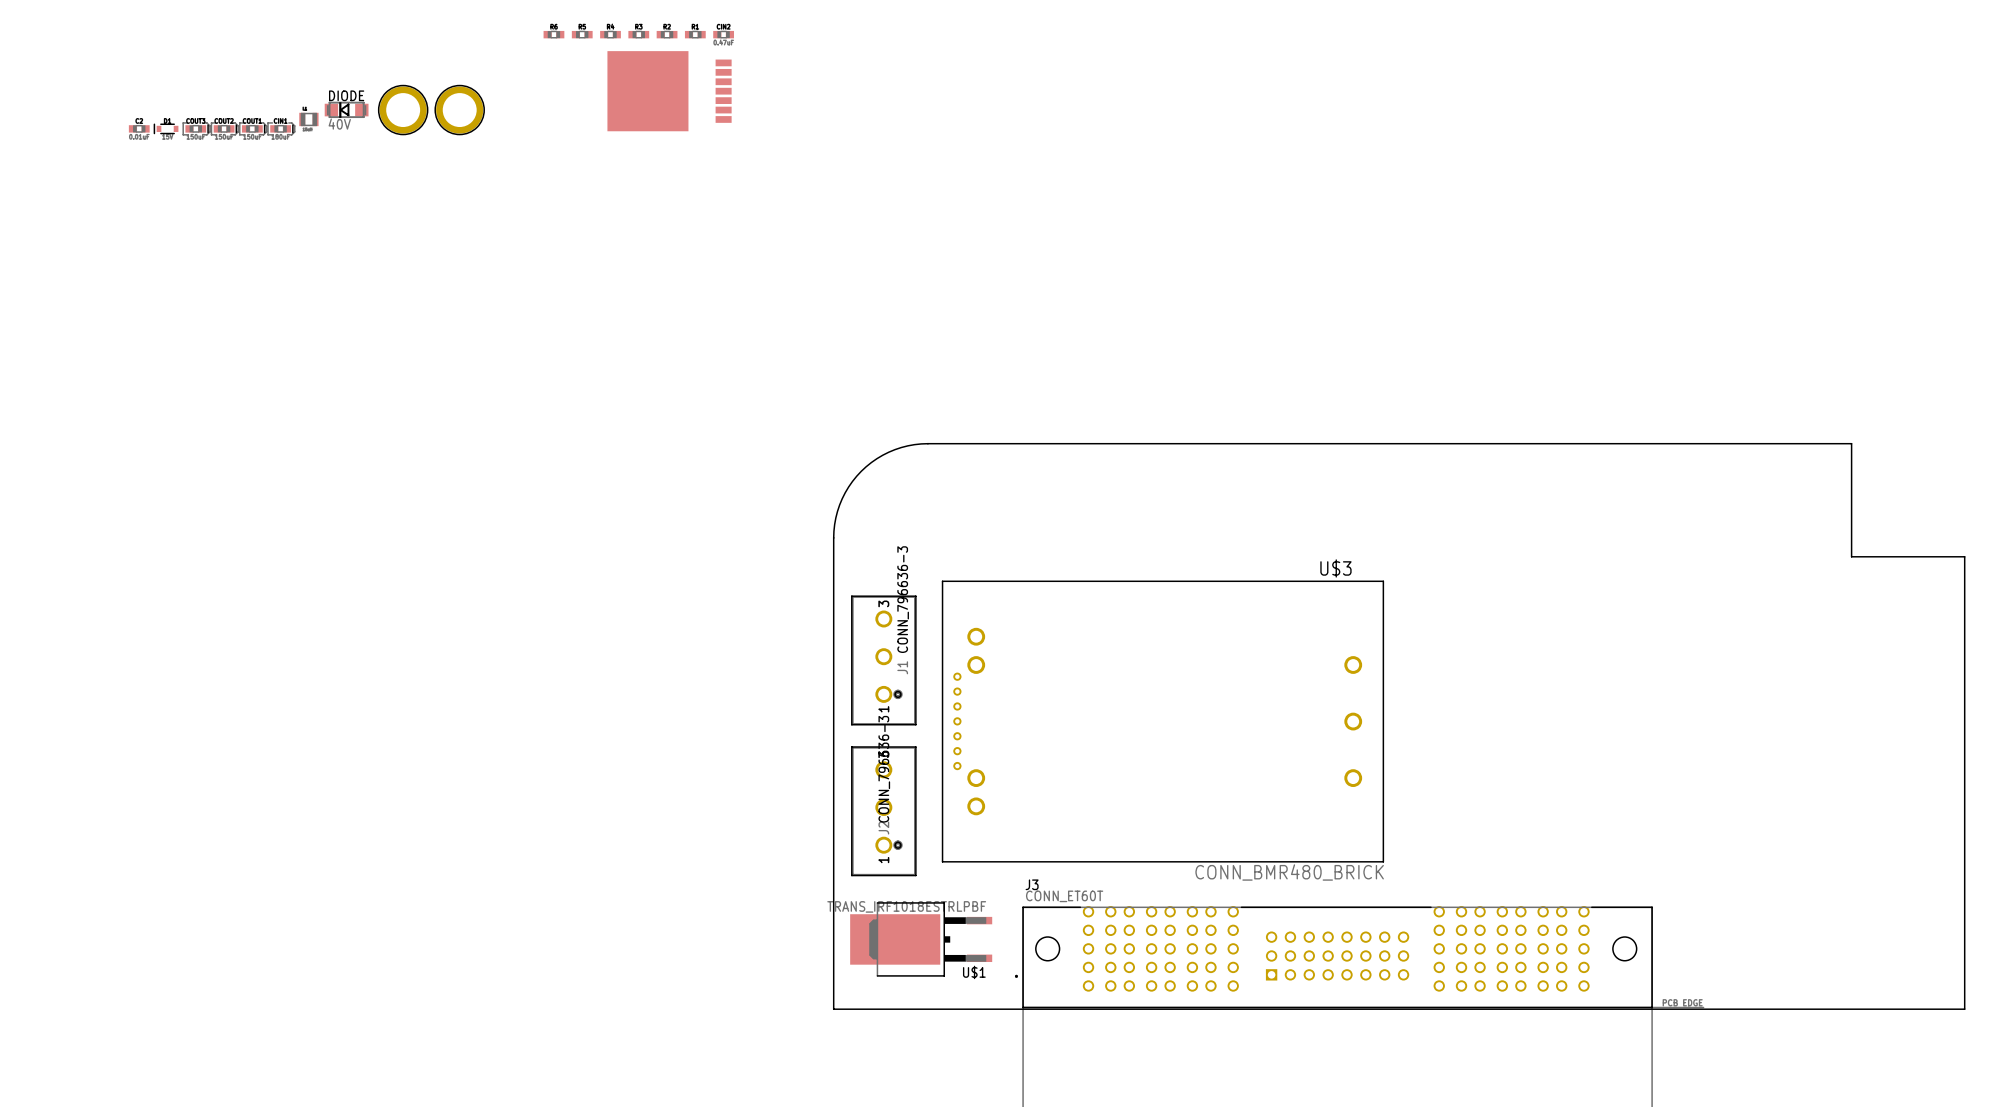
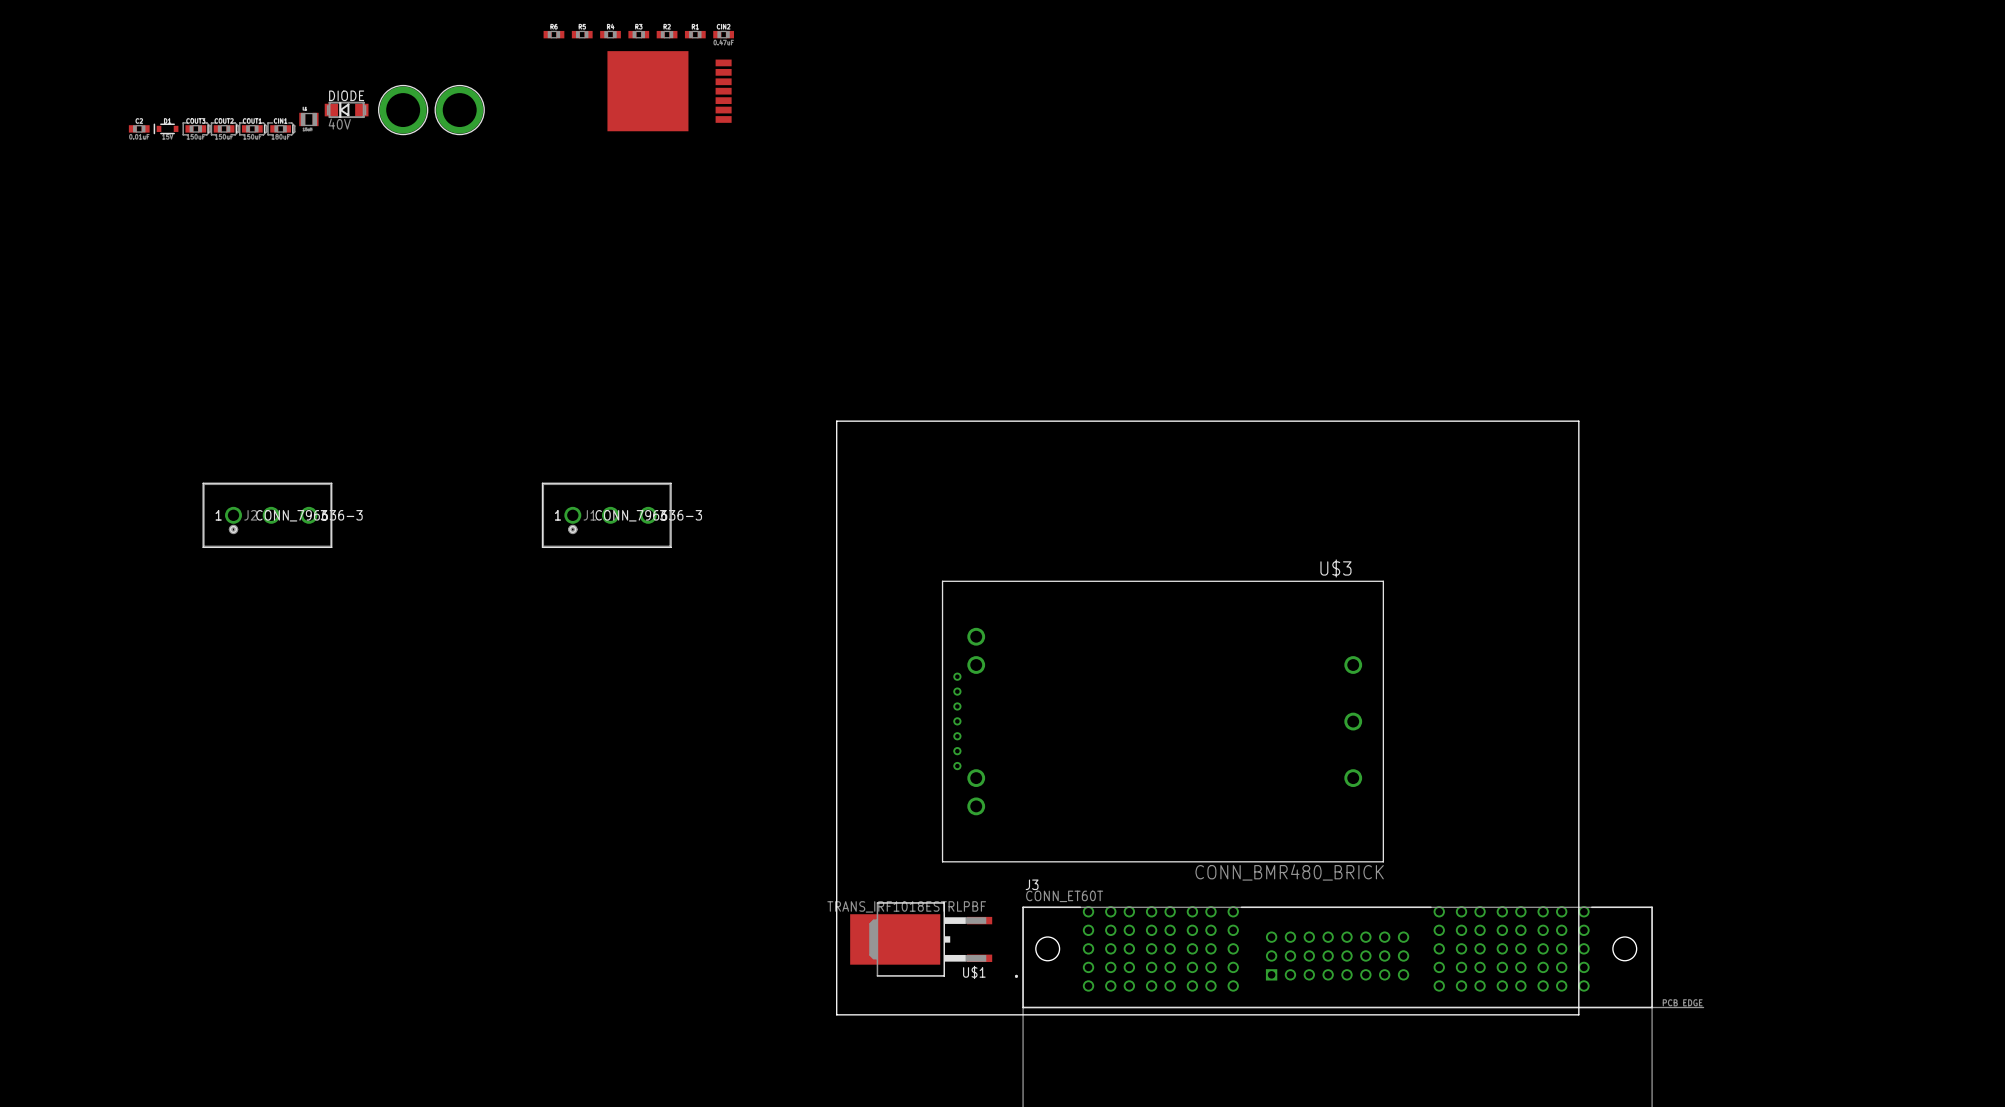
board edge: (927, 443) (1851, 443) (1851, 556) (1964, 556) (1964, 1009) (833, 1009) (834, 524) (845, 492) (866, 466) (895, 449) (927, 443) -> (836, 421) (836, 1014) (1578, 1014) (1578, 421) (836, 421)
J1 value position: CONN_796636-3 (903, 599) -> CONN_796636-3 (648, 515)
J1 rotation: 0° (883, 660) -> 90° clockwise (606, 515)
J1 position: (883, 660) -> (606, 515)
J1 name position: J1 (902, 667) -> J1 (589, 515)
J2 rotation: 0° (883, 811) -> 90° clockwise (267, 515)
J2 position: (883, 811) -> (267, 515)

